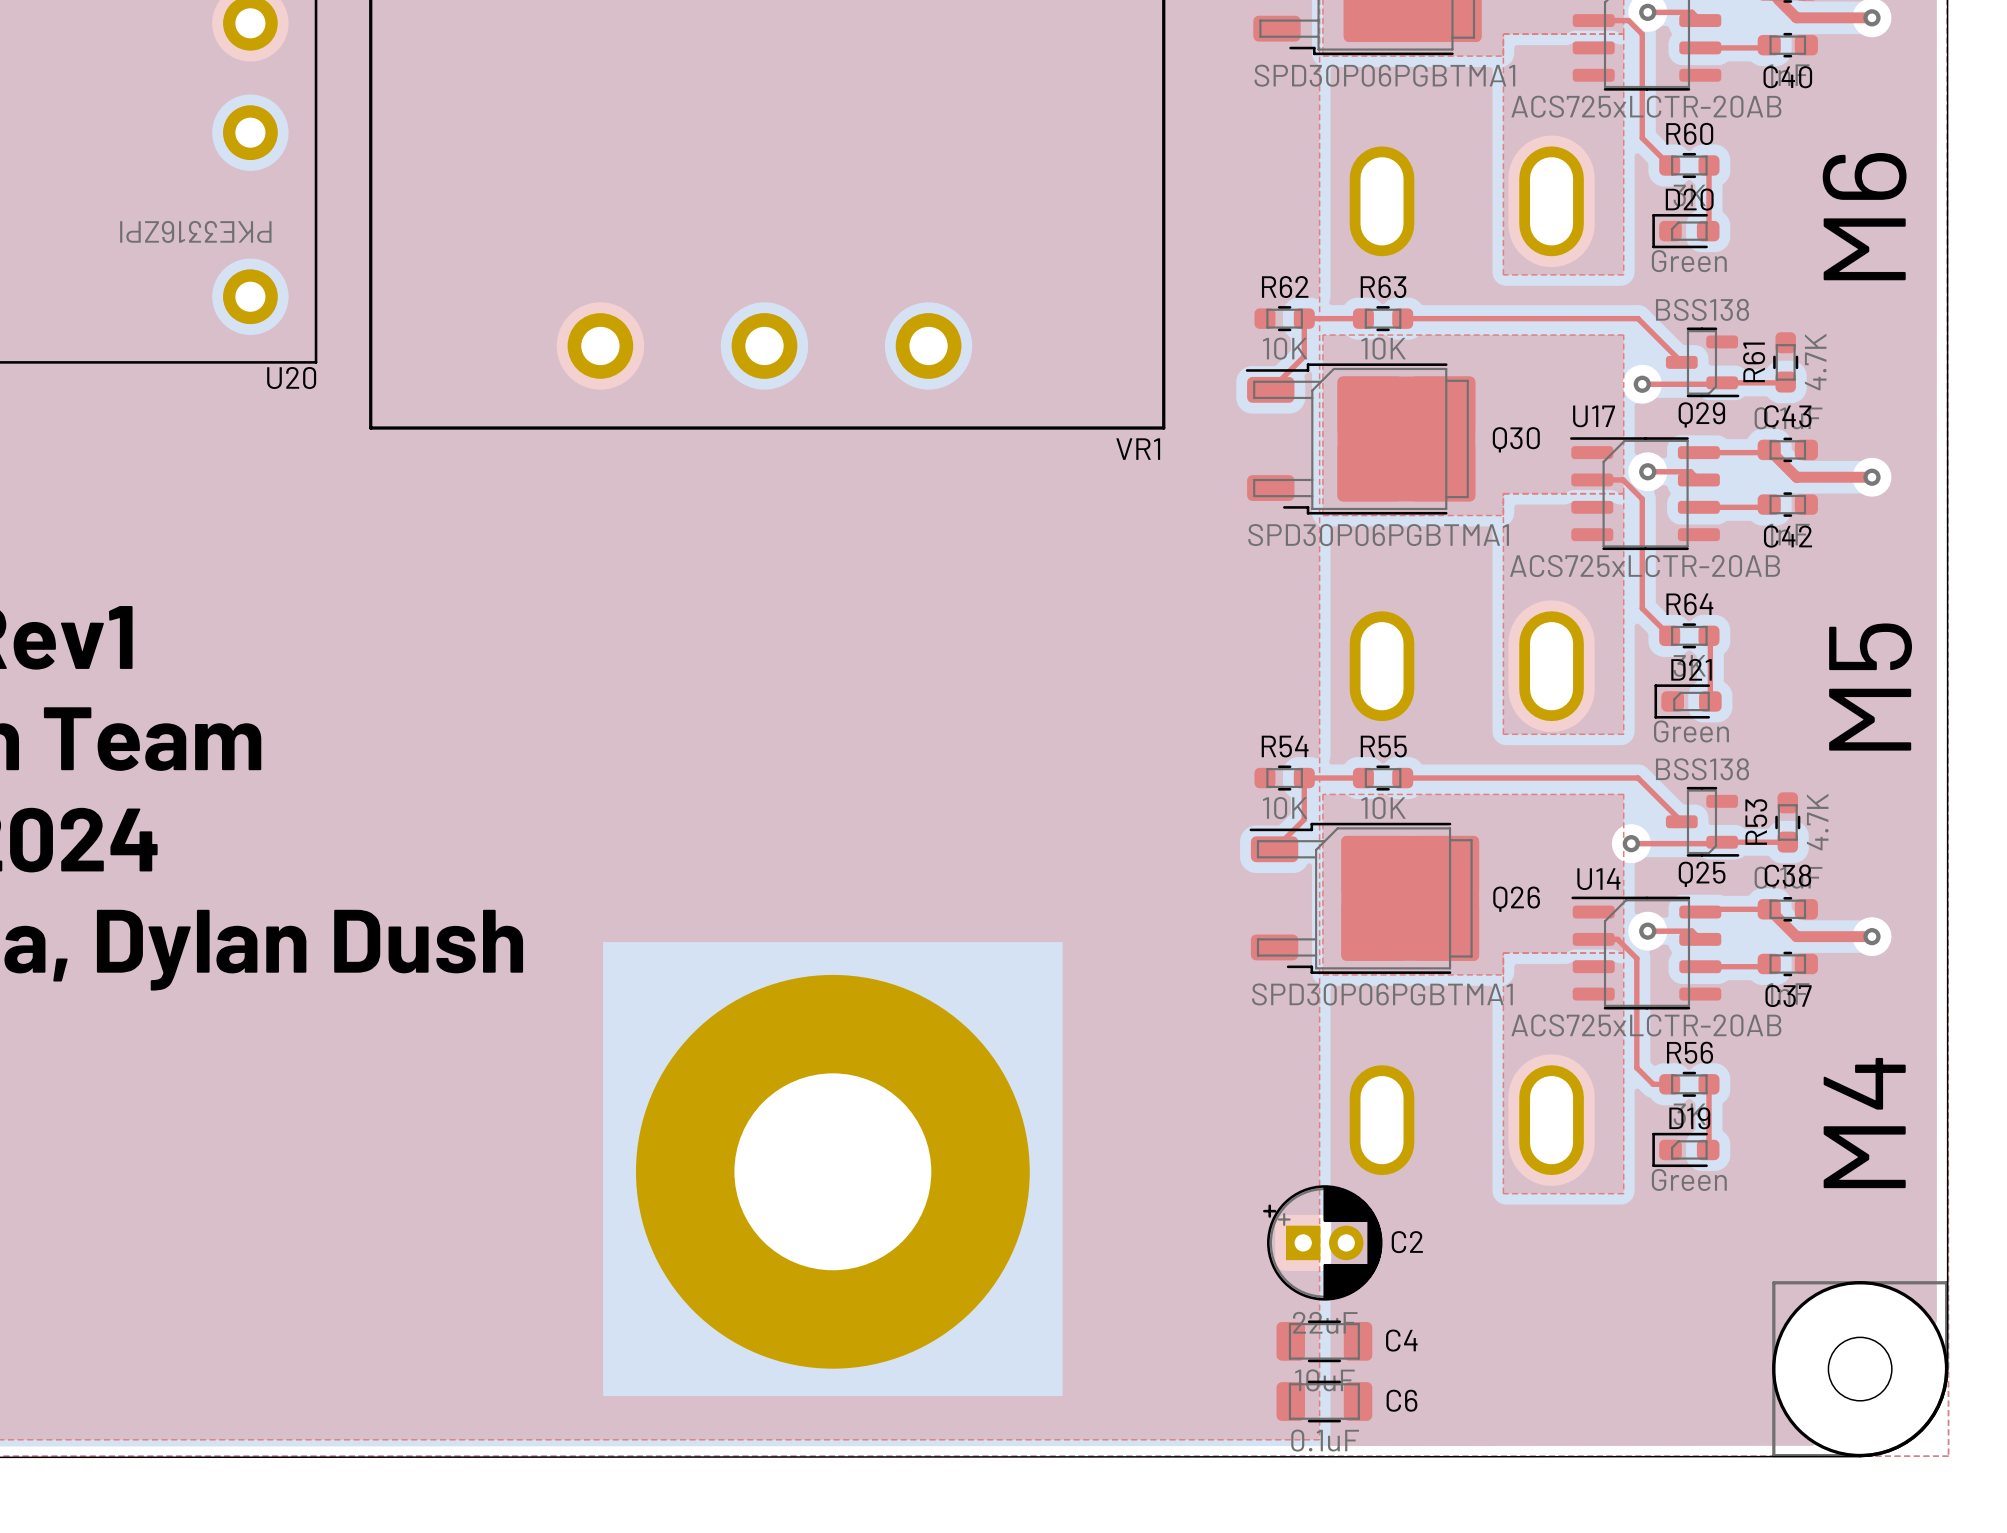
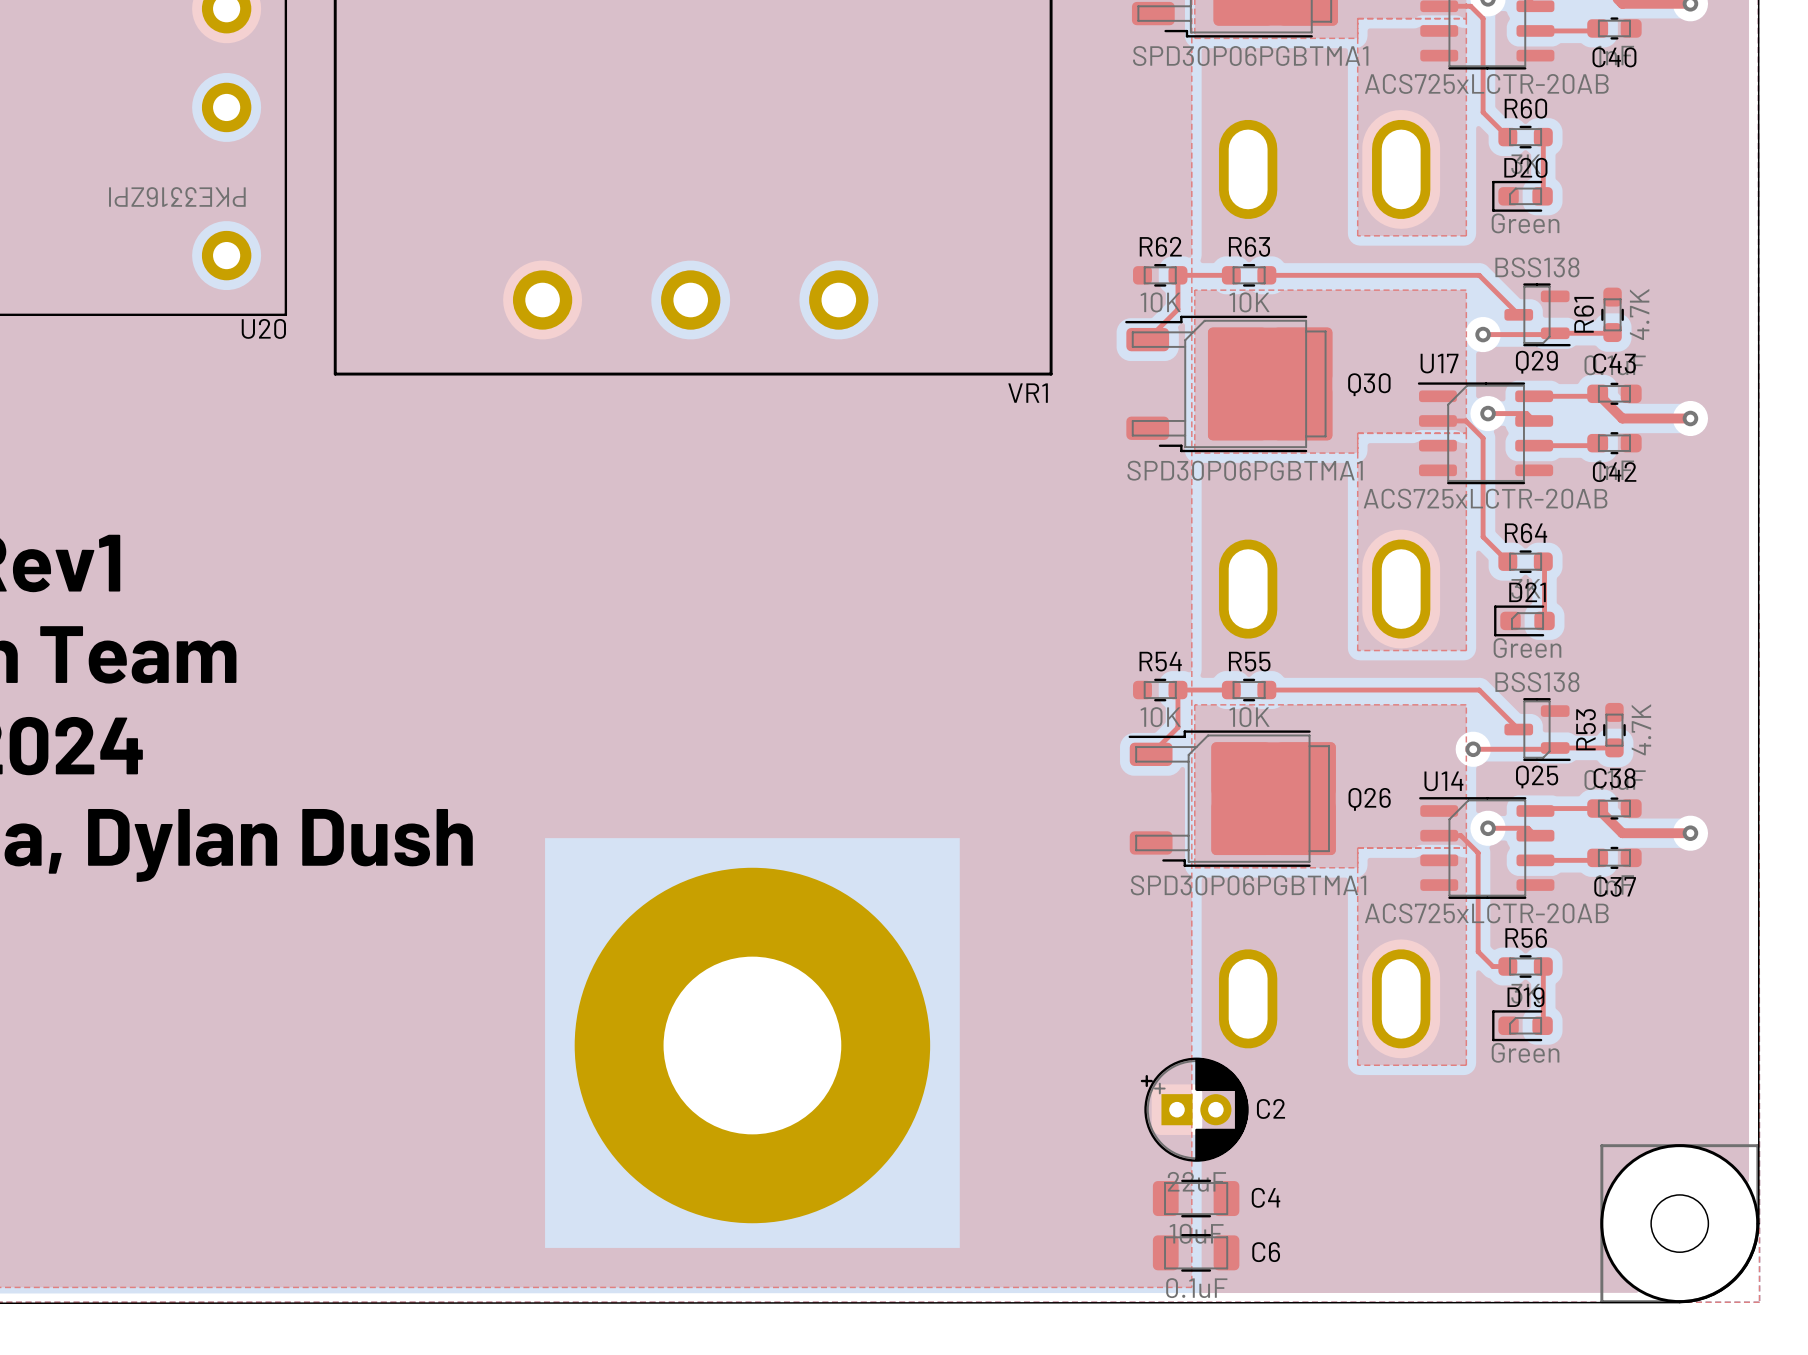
text: M6 (1864, 216) -> none
text: M5 (1870, 687) -> none
text: M4 (1864, 1123) -> none

